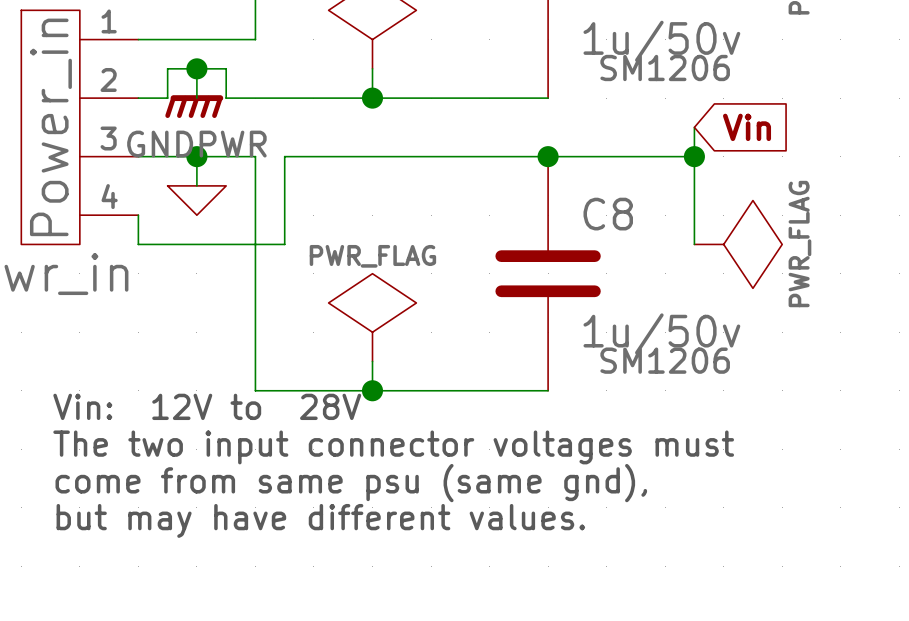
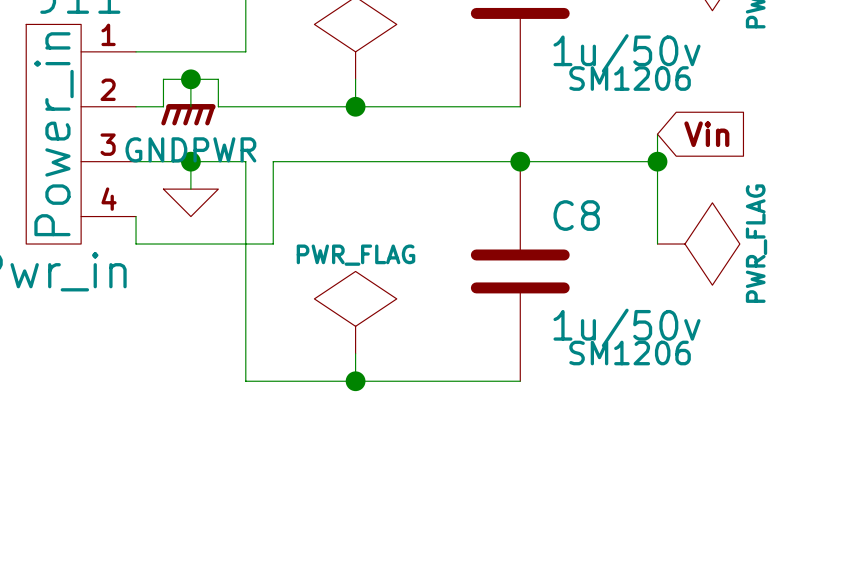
text: Vin: 12V to 28V (207, 406) -> none
text: The two input connector voltages must (393, 447) -> none
text: come from same psu (same gnd), (351, 483) -> none
text: but may have different values. (320, 520) -> none

